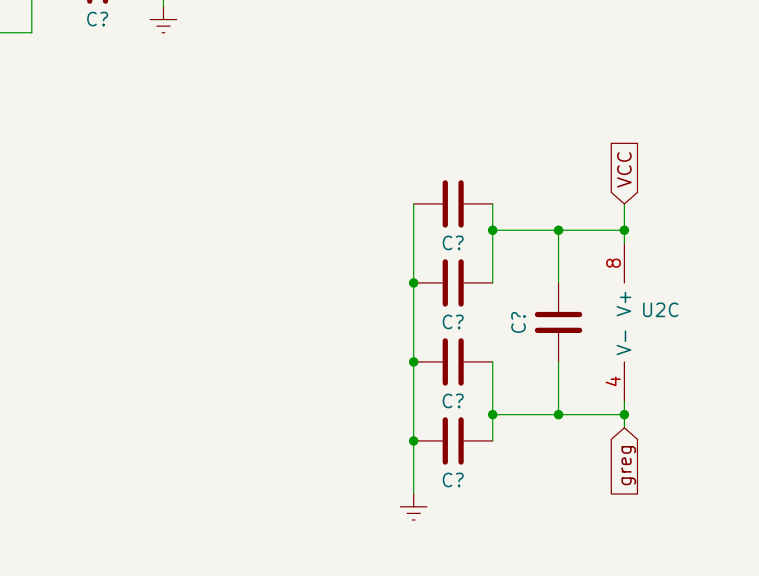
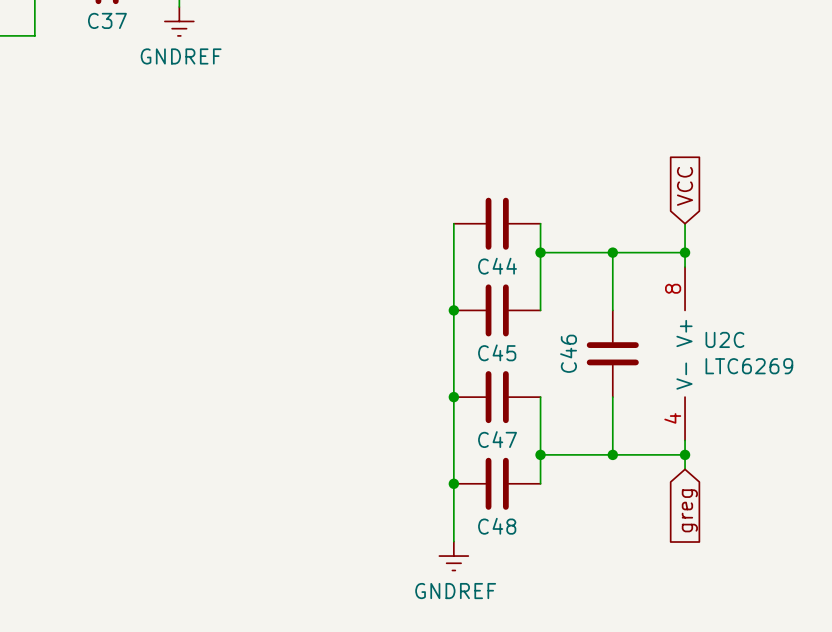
C? name: C? (97, 19) -> C37 (107, 20)
power symbol text: none -> GNDREF (181, 56)
C? name: C? (453, 242) -> C44 (497, 266)
C? name: C? (453, 321) -> C45 (497, 352)
C? name: C? (518, 322) -> C46 (568, 353)
U2C value: none -> LTC6269 (749, 366)
C? name: C? (453, 400) -> C47 (497, 439)
C? name: C? (453, 479) -> C48 (497, 526)
power symbol text: none -> GNDREF (455, 591)

